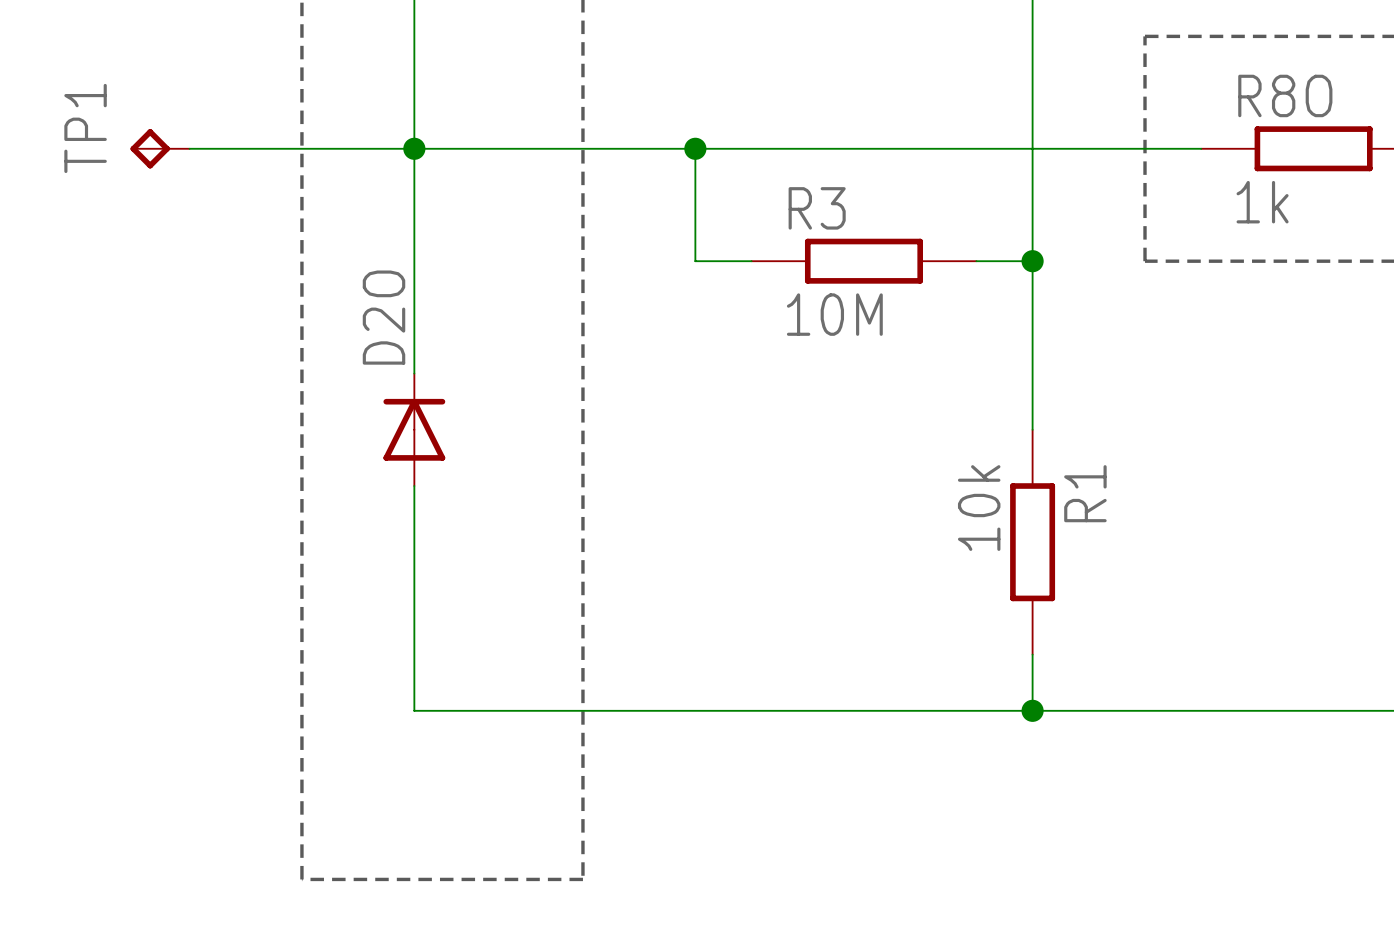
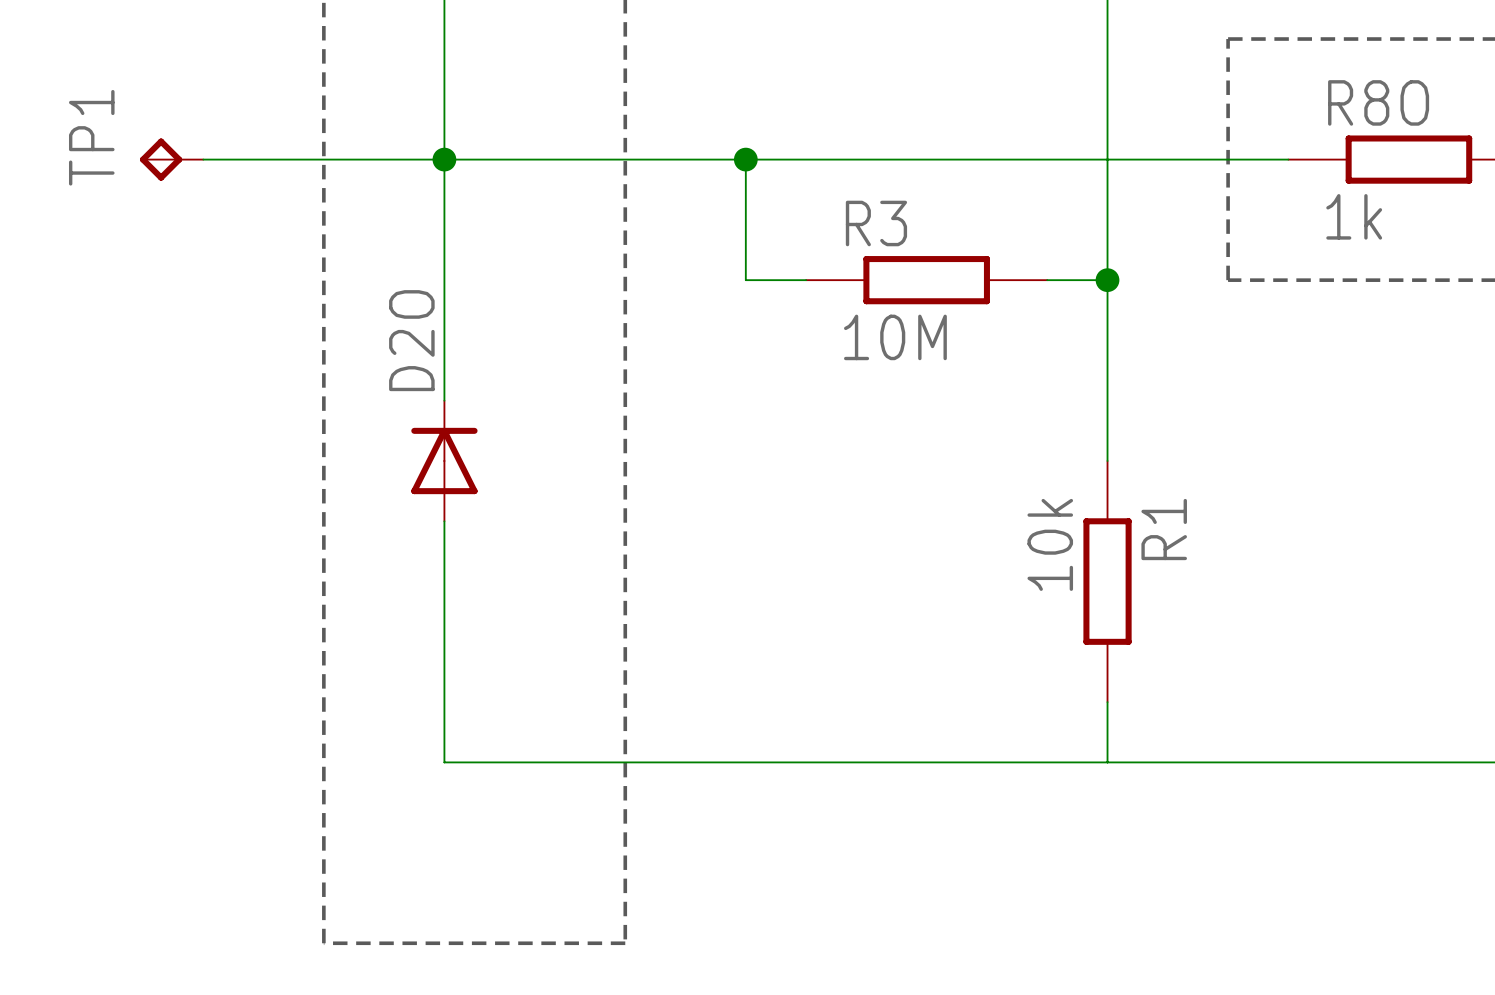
junction: (1032, 710) -> none

